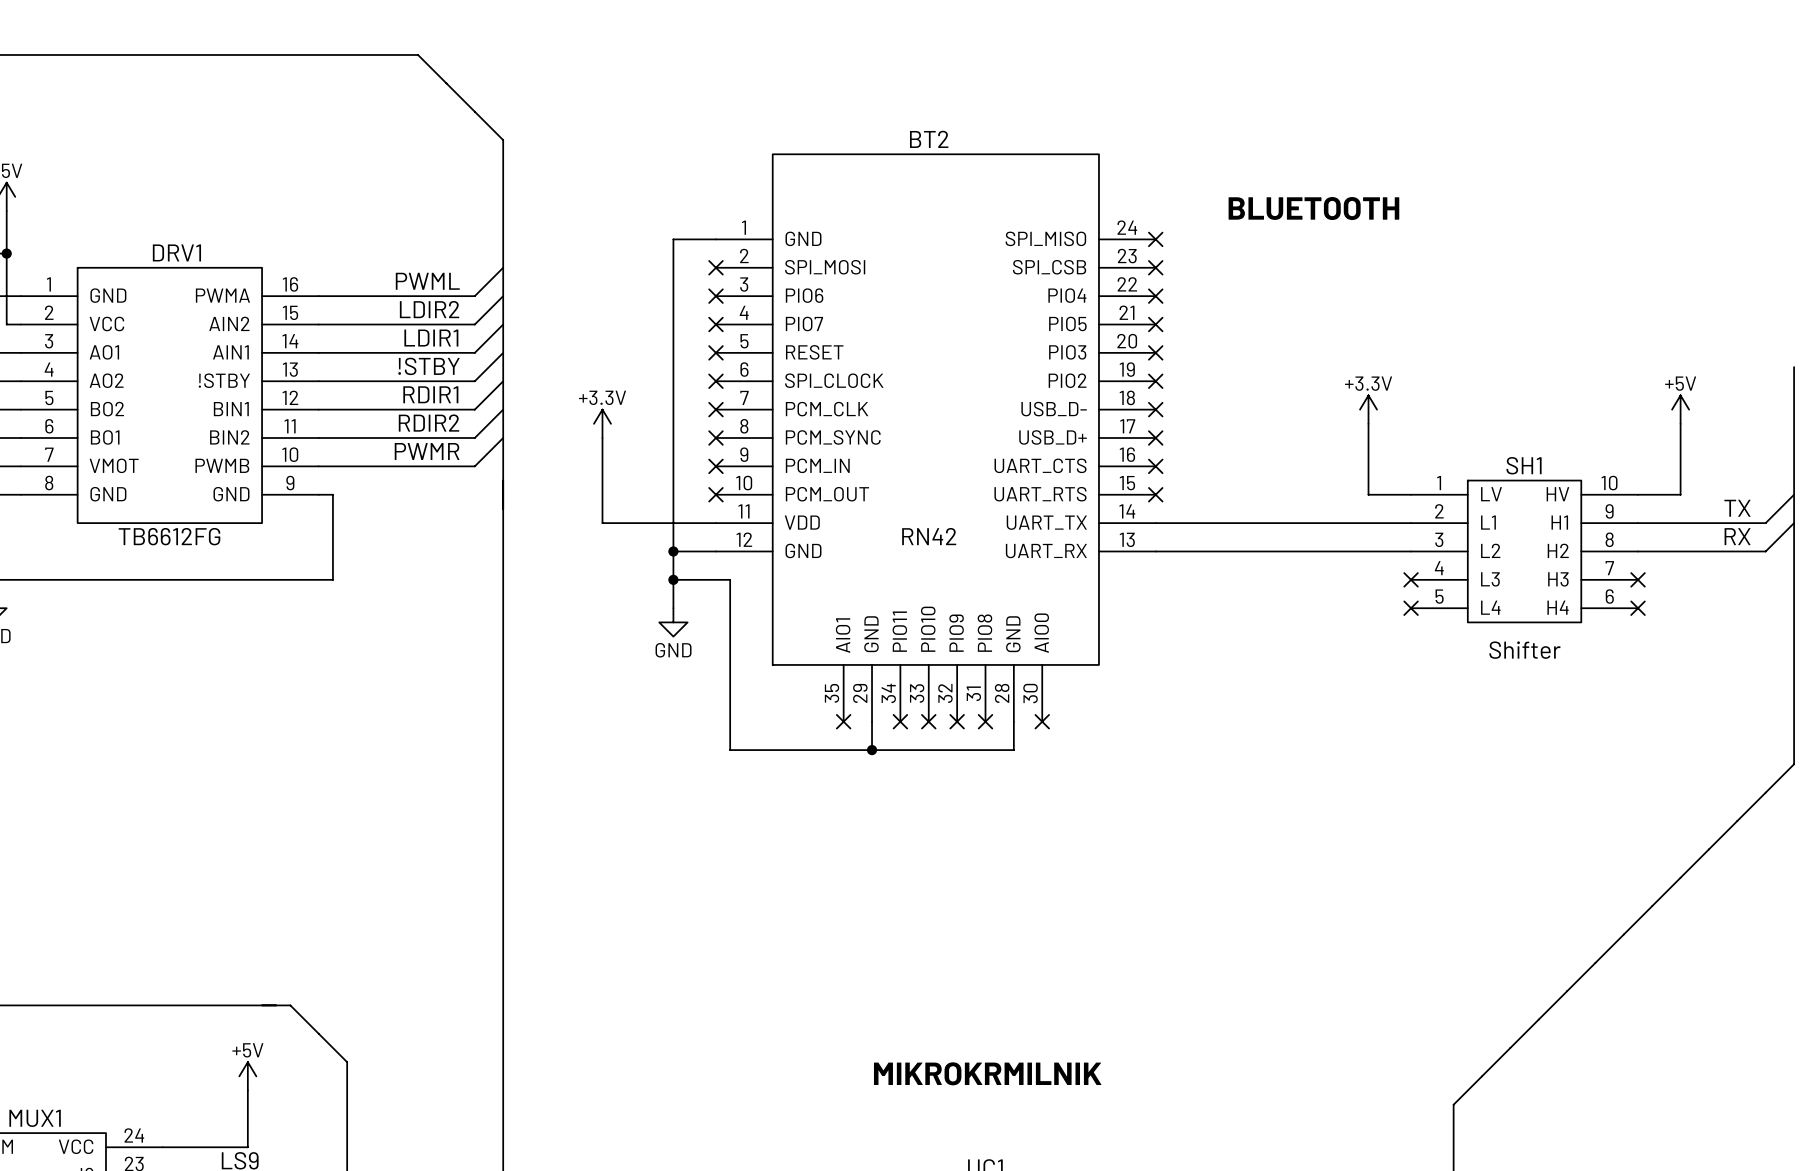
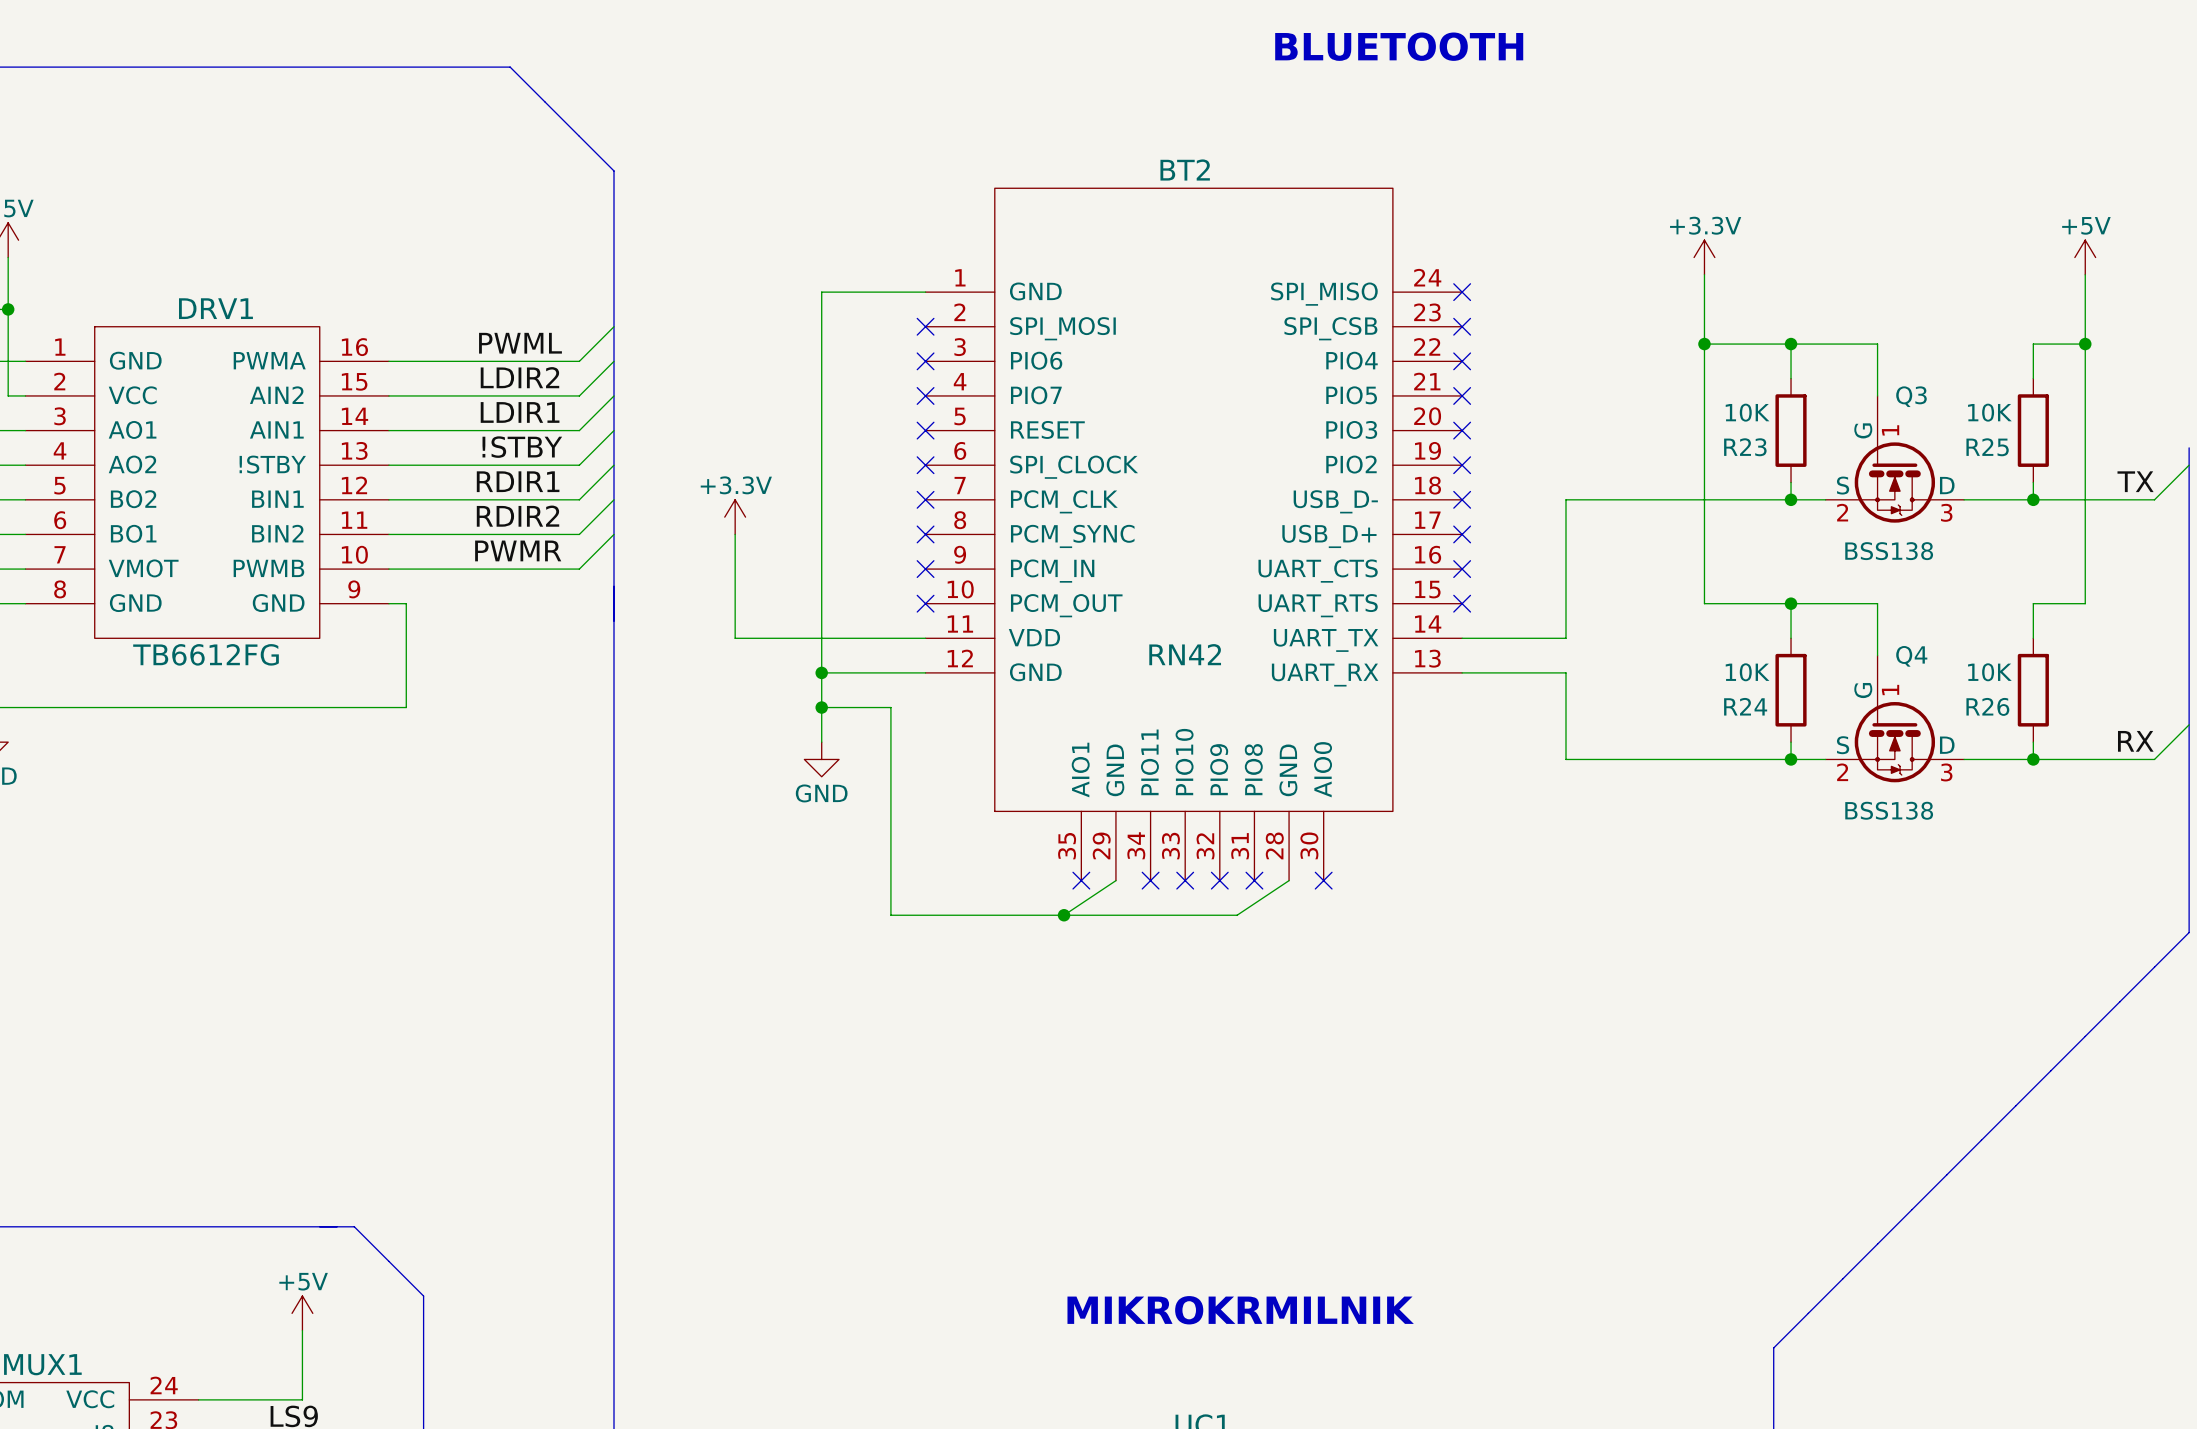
text position: BLUETOOTH (1313, 208) -> BLUETOOTH (1399, 46)
no-connect mark: (1155, 239) -> none
no-connect mark: none -> (1462, 292)
no-connect mark: (715, 267) -> none
no-connect mark: none -> (925, 326)
no-connect mark: (1155, 267) -> none
no-connect mark: none -> (1462, 326)
wire: none -> (1704, 344) (1877, 344) (1877, 395)
junction: none -> (1704, 344)
wire: none -> (1791, 344) (1791, 378)
junction: none -> (1791, 344)
wire: none -> (2085, 344) (2033, 344) (2033, 378)
junction: none -> (2085, 344)
no-connect mark: (715, 296) -> none
no-connect mark: none -> (925, 361)
no-connect mark: (1155, 296) -> none
no-connect mark: none -> (1462, 361)
no-connect mark: (715, 324) -> none
no-connect mark: none -> (925, 395)
no-connect mark: (1155, 324) -> none
no-connect mark: none -> (1462, 395)
no-connect mark: (715, 352) -> none
no-connect mark: none -> (925, 430)
no-connect mark: (1155, 352) -> none
no-connect mark: none -> (1462, 430)
R23: none -> 10K (1791, 430)
R25: none -> 10K (2033, 430)
Q3: none -> BSS138 (1894, 459)
no-connect mark: (715, 381) -> none
no-connect mark: none -> (925, 465)
no-connect mark: (1155, 381) -> none
no-connect mark: none -> (1462, 465)
wire: none -> (2189, 465) (2154, 499) (1964, 499)
wire: none -> (1791, 482) (1791, 499)
wire: none -> (2033, 482) (2033, 499)
no-connect mark: (715, 409) -> none
no-connect mark: none -> (925, 499)
no-connect mark: (1155, 409) -> none
no-connect mark: none -> (1462, 499)
power symbol position: +3.3V (1368, 409) -> +3.3V (1704, 257)
junction: none -> (1791, 499)
junction: none -> (2033, 499)
power symbol position: +5V (1680, 409) -> +5V (2085, 257)
wire: (1368, 423) (1368, 494) (1396, 494) -> (1704, 274) (1704, 603)
wire: (1680, 423) (1680, 494) -> (2085, 274) (2085, 603) (2050, 603)
no-connect mark: (715, 438) -> none
no-connect mark: none -> (925, 534)
BT2 position: (935, 438) -> (1193, 534)
no-connect mark: (1155, 438) -> none
no-connect mark: none -> (1462, 534)
no-connect mark: (715, 466) -> none
no-connect mark: none -> (925, 569)
no-connect mark: (1155, 466) -> none
no-connect mark: none -> (1462, 569)
no-connect mark: (715, 494) -> none
no-connect mark: none -> (925, 603)
no-connect mark: (1155, 494) -> none
no-connect mark: none -> (1462, 603)
wire: none -> (1721, 603) (1877, 603) (1877, 655)
junction: none -> (1791, 603)
wire: (1638, 494) (1666, 494) -> (2033, 638) (2033, 603)
wire: (1794, 494) (1765, 523) (1638, 523) -> none
label position: TX (1737, 508) -> TX (2135, 481)
wire: (1283, 523) (1411, 523) -> (1565, 638) (1565, 499) (1825, 499)
wire: (1794, 523) (1765, 551) (1638, 551) -> none
label position: RX (1737, 536) -> RX (2135, 741)
wire: (1283, 551) (1411, 551) -> (1565, 672) (1565, 759) (1825, 759)
SH1: Shifter (1524, 551) -> none
R24: none -> 10K (1791, 690)
R26: none -> 10K (2033, 690)
no-connect mark: (1411, 579) -> none
no-connect mark: (1638, 579) -> none
Q4: none -> BSS138 (1894, 718)
wire: none -> (2189, 724) (2154, 759) (1964, 759)
no-connect mark: (1411, 608) -> none
no-connect mark: (1638, 608) -> none
wire: none -> (2033, 742) (2033, 759)
junction: none -> (1791, 759)
junction: none -> (2033, 759)
no-connect mark: (843, 721) -> none
wire: (872, 721) (872, 750) -> (1115, 880) (1064, 915)
no-connect mark position: (900, 721) -> (1081, 880)
no-connect mark: (928, 721) -> none
no-connect mark: none -> (1150, 880)
no-connect mark: (957, 721) -> none
no-connect mark: none -> (1185, 880)
no-connect mark: (985, 721) -> none
no-connect mark: none -> (1219, 880)
wire: (1013, 721) (1013, 750) -> (1289, 880) (1237, 915)
no-connect mark position: (1042, 721) -> (1254, 880)
no-connect mark: none -> (1323, 880)

